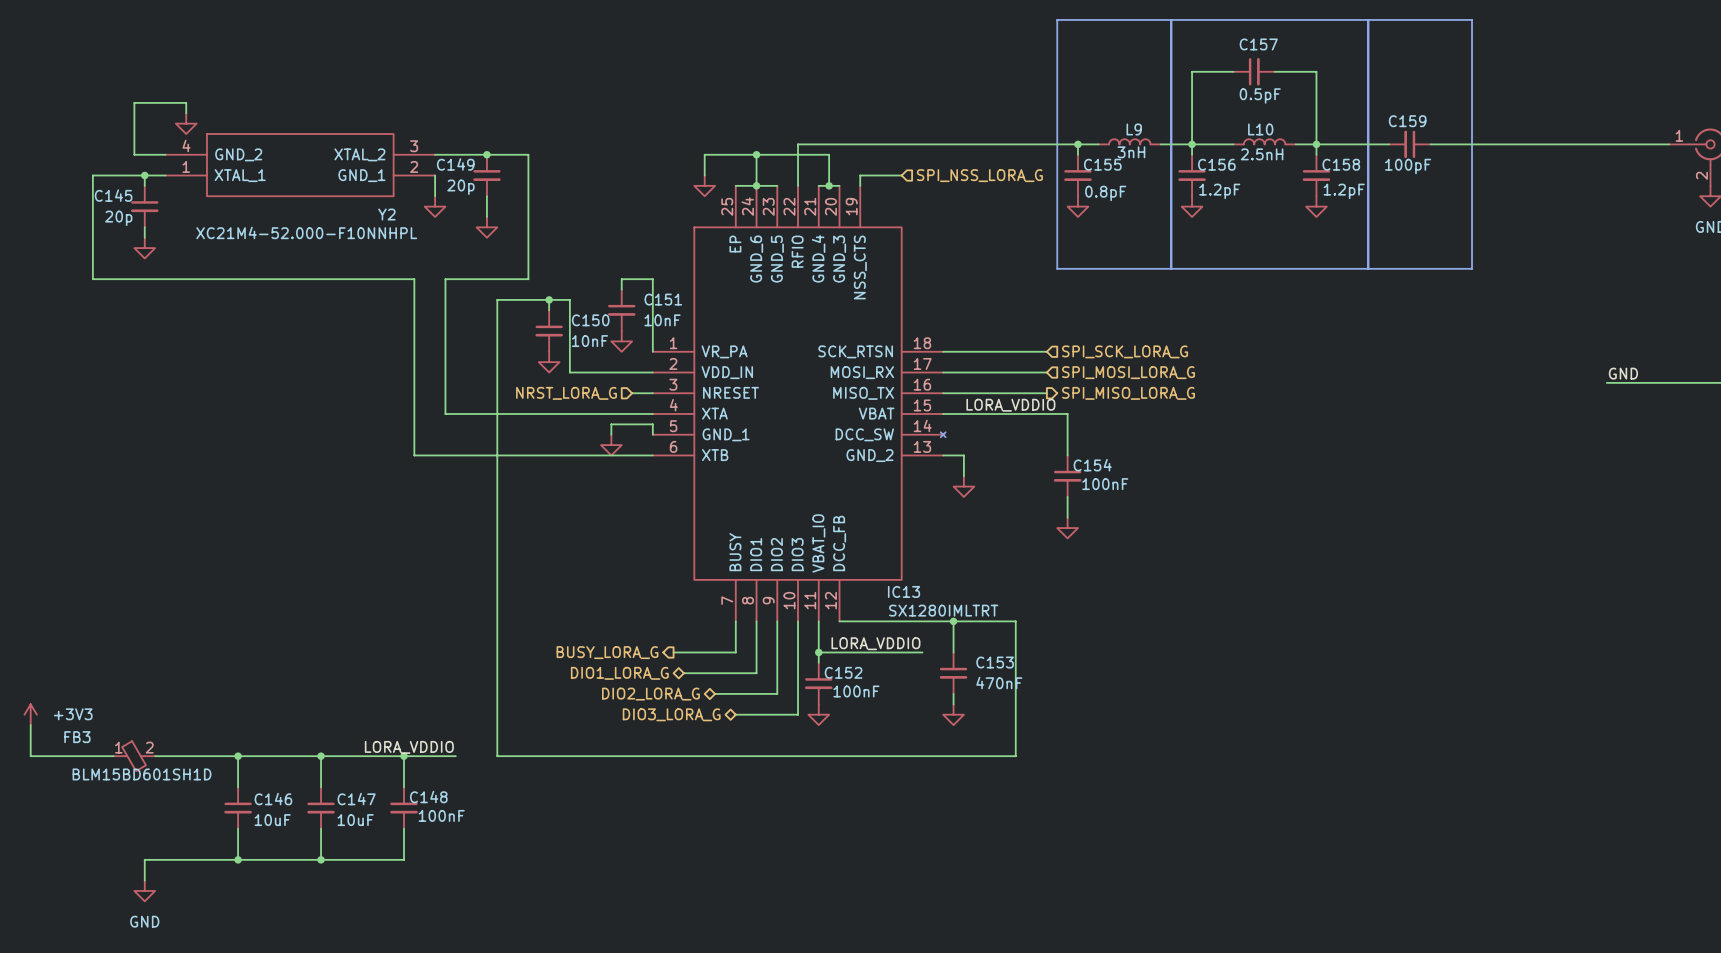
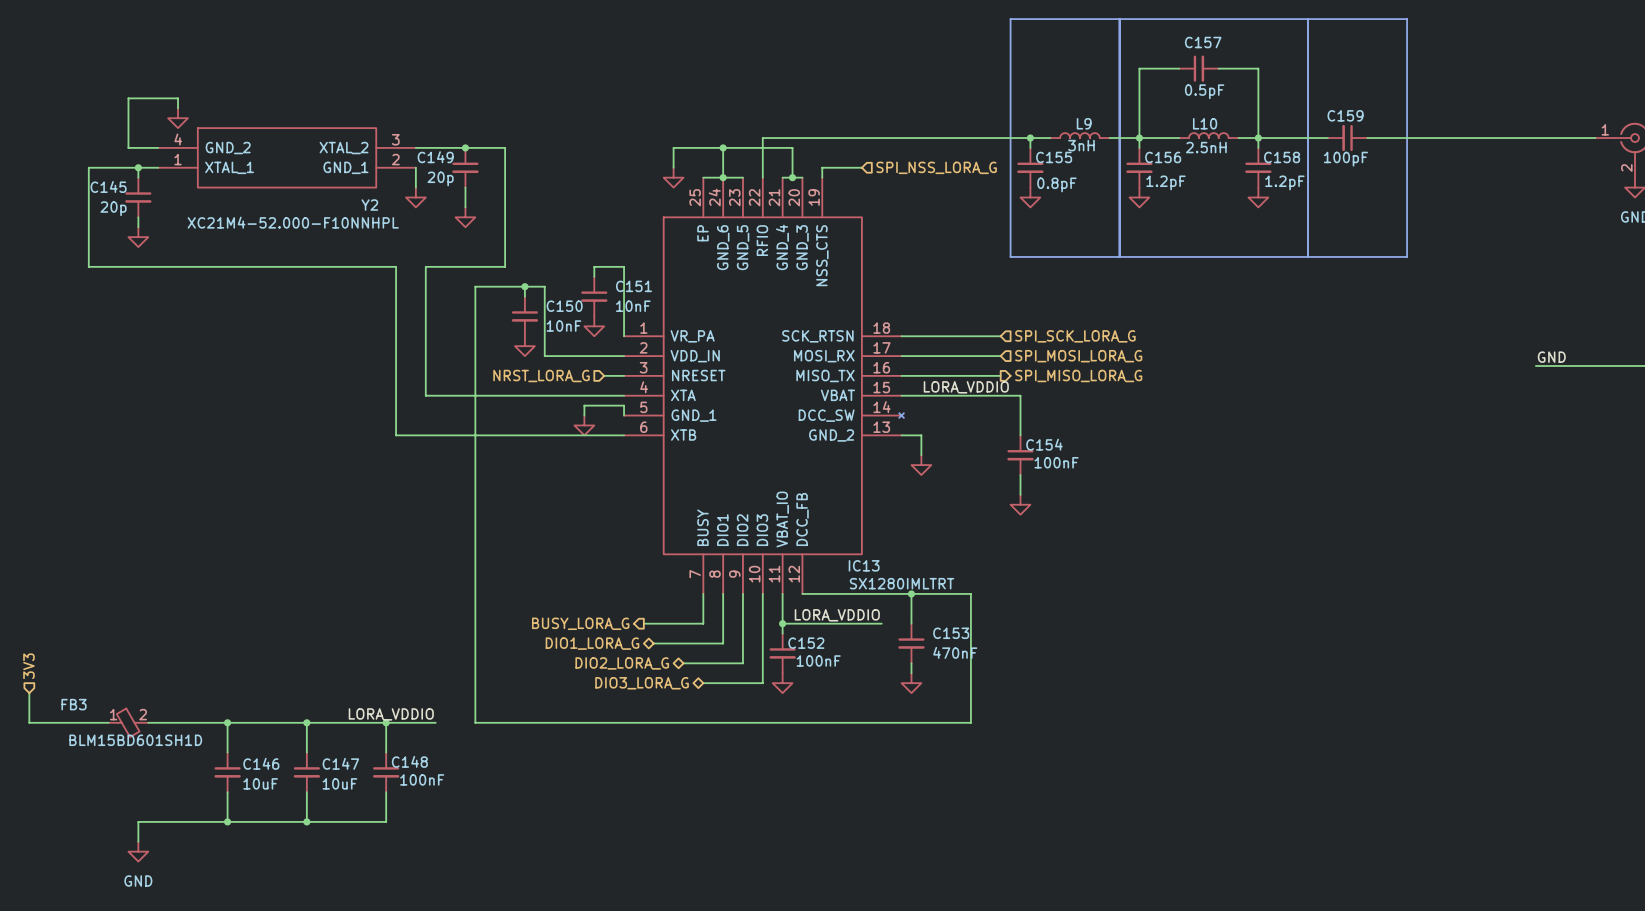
hierarchical label: none -> 3V3 (28, 666)
power symbol: +3V3 (30, 714) -> none

